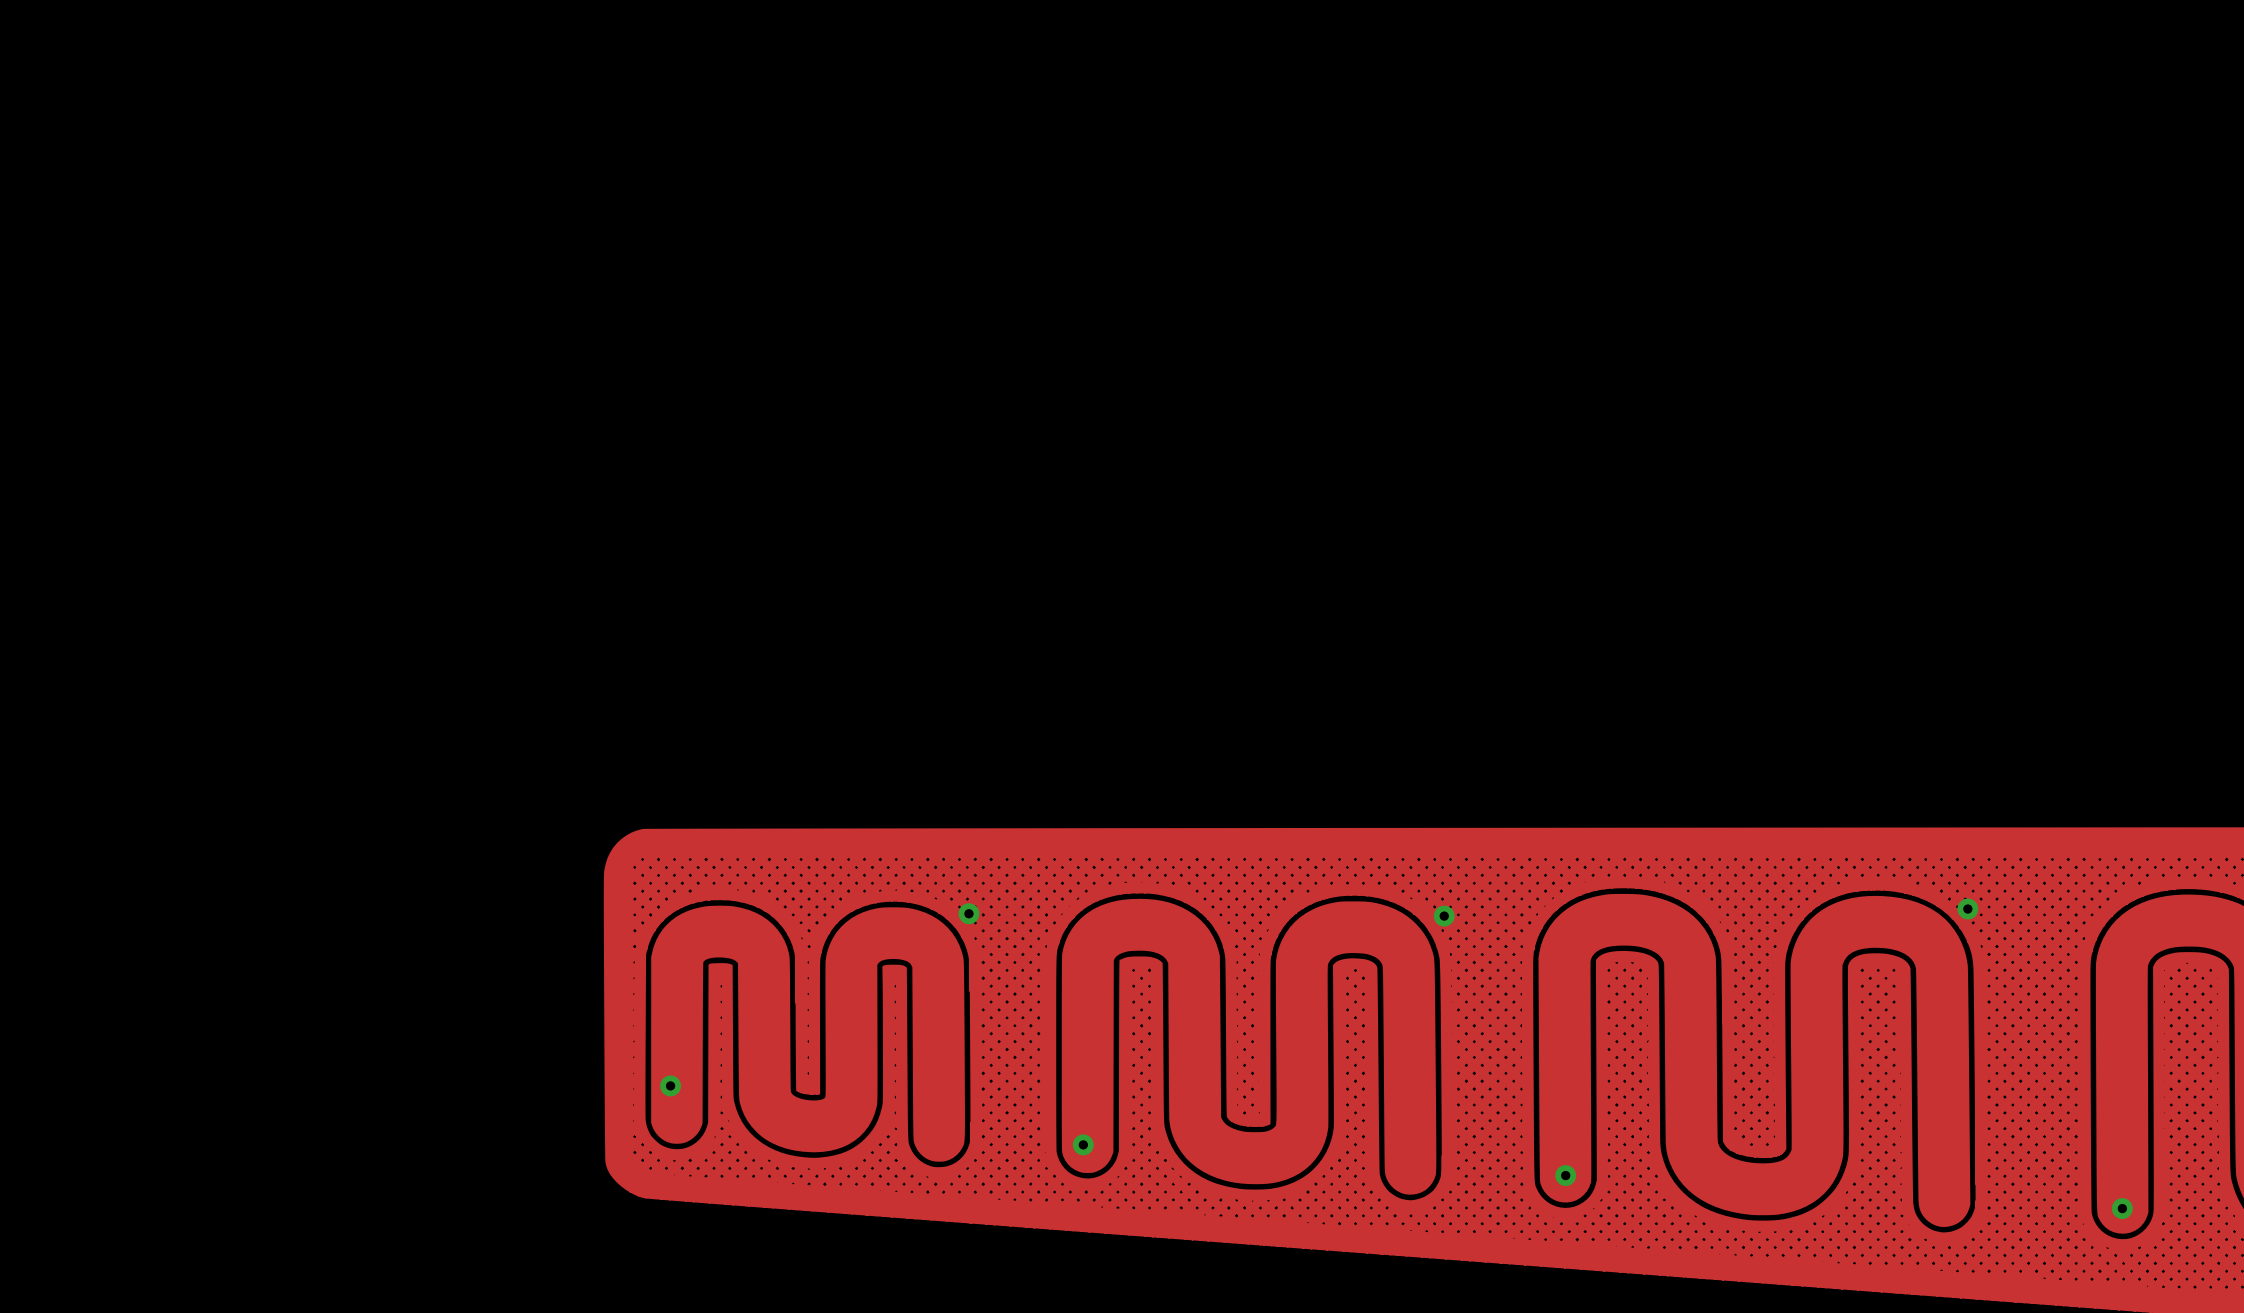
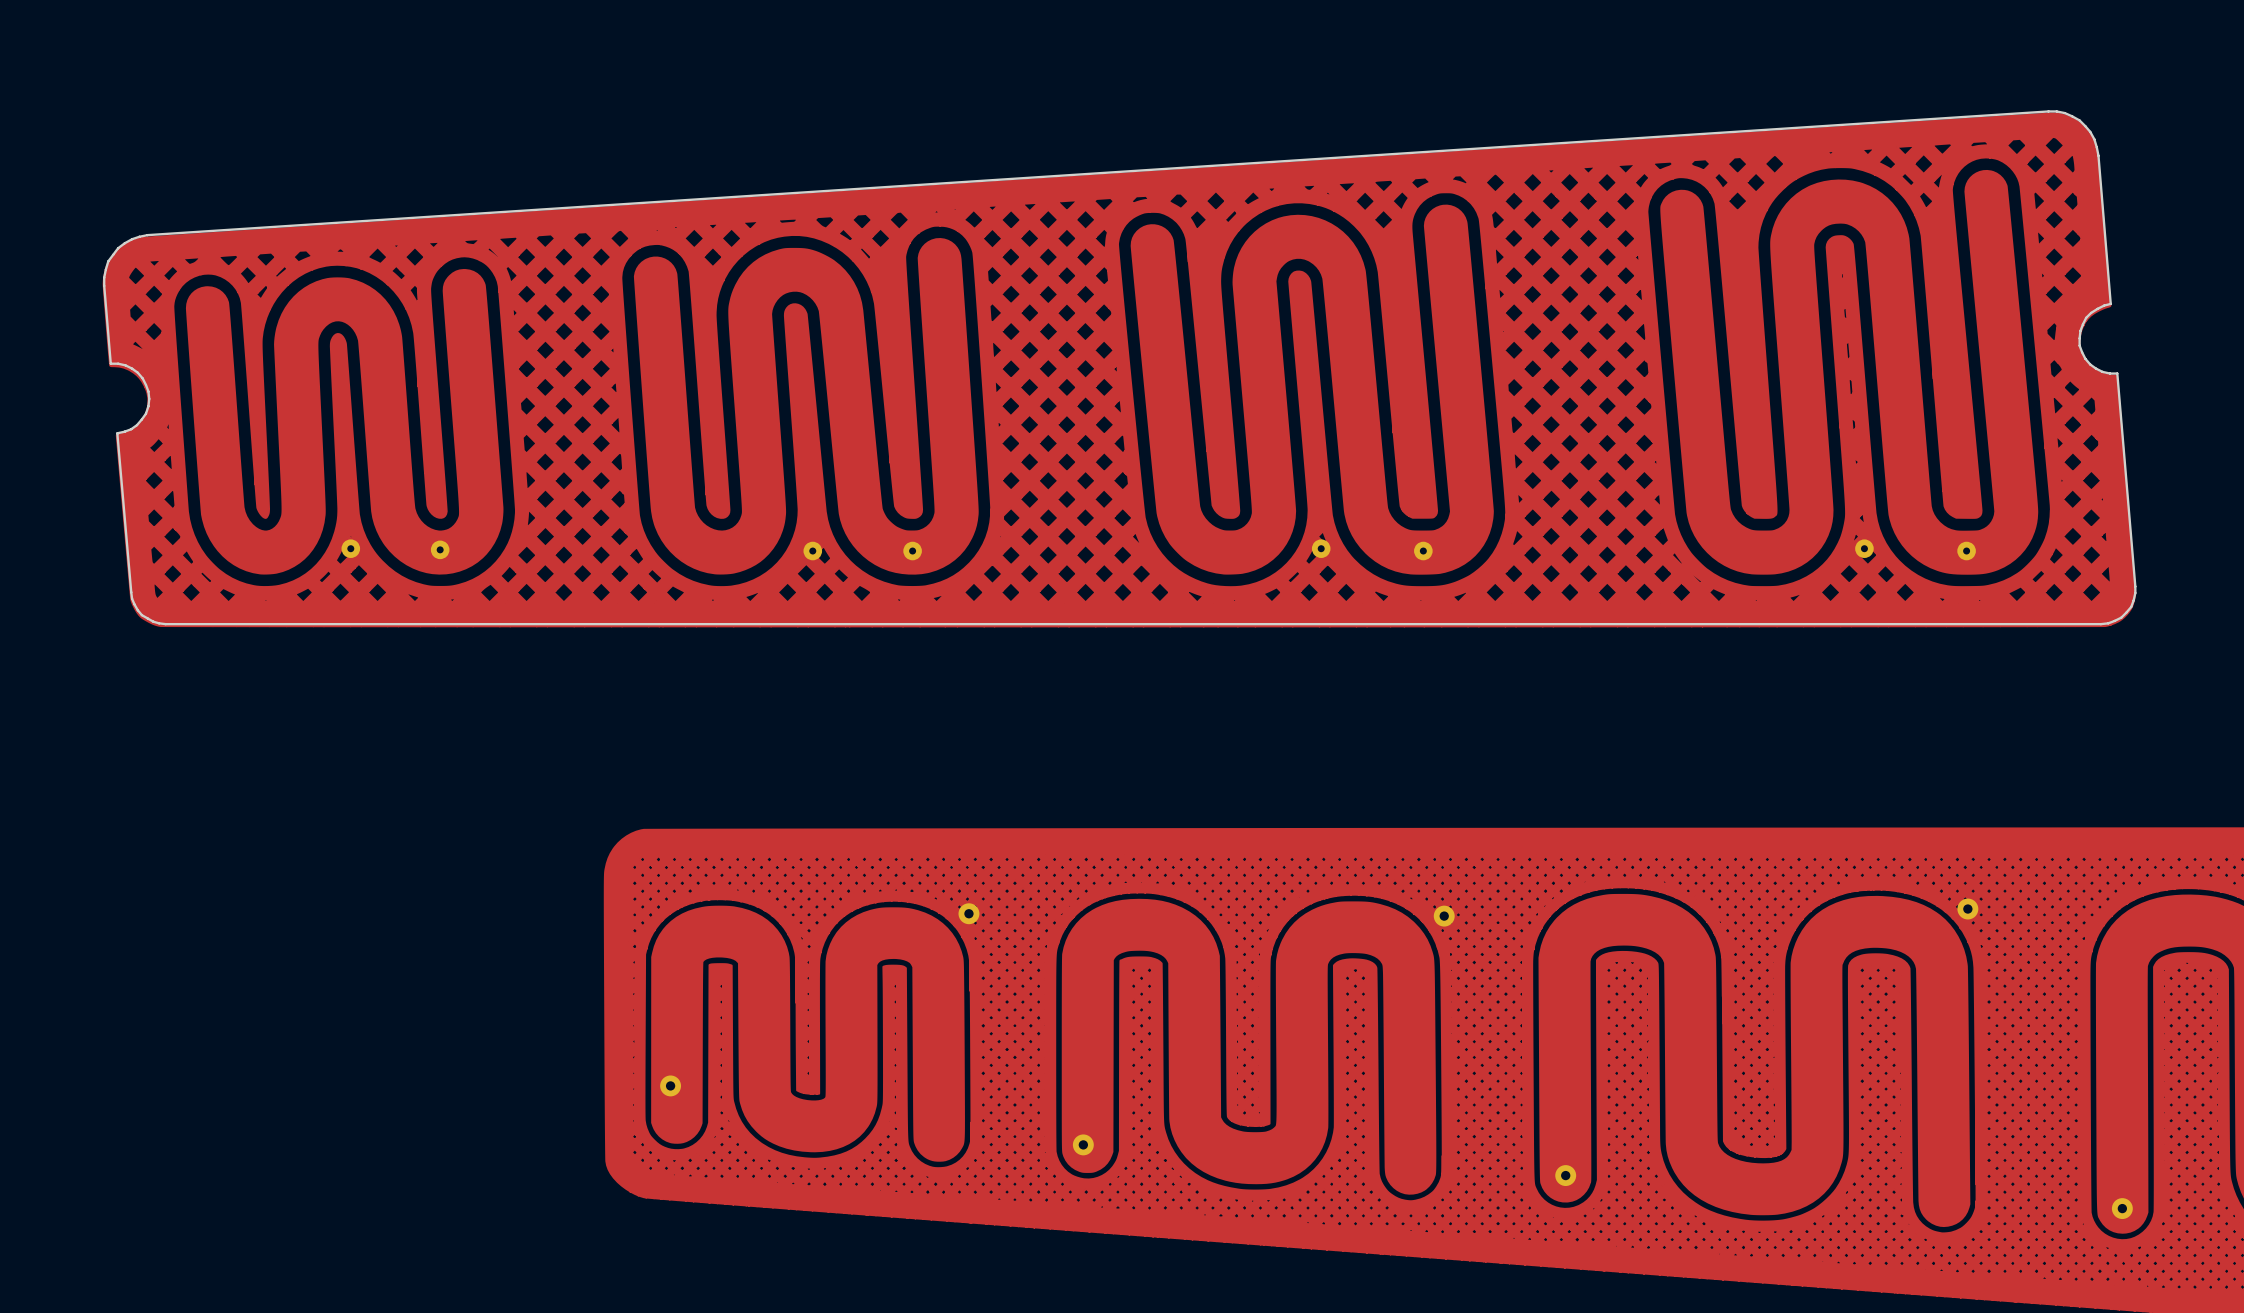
board edge: none -> (2048, 111) (2064, 113) (2079, 120) (2094, 139) (2098, 155) (2110, 303) (2097, 308) (2086, 317) (2080, 330) (2079, 345) (2090, 364) (2102, 371) (2117, 373) (2135, 586) (2131, 606) (2121, 617) (2108, 623) (165, 624) (153, 621) (141, 615) (132, 598) (117, 433) (131, 429) (136, 425) (145, 413) (149, 398) (145, 385) (137, 372) (125, 365) (110, 363) (104, 277) (108, 261) (118, 248) (139, 236) (2048, 111)
part: none -> (1119, 369)

